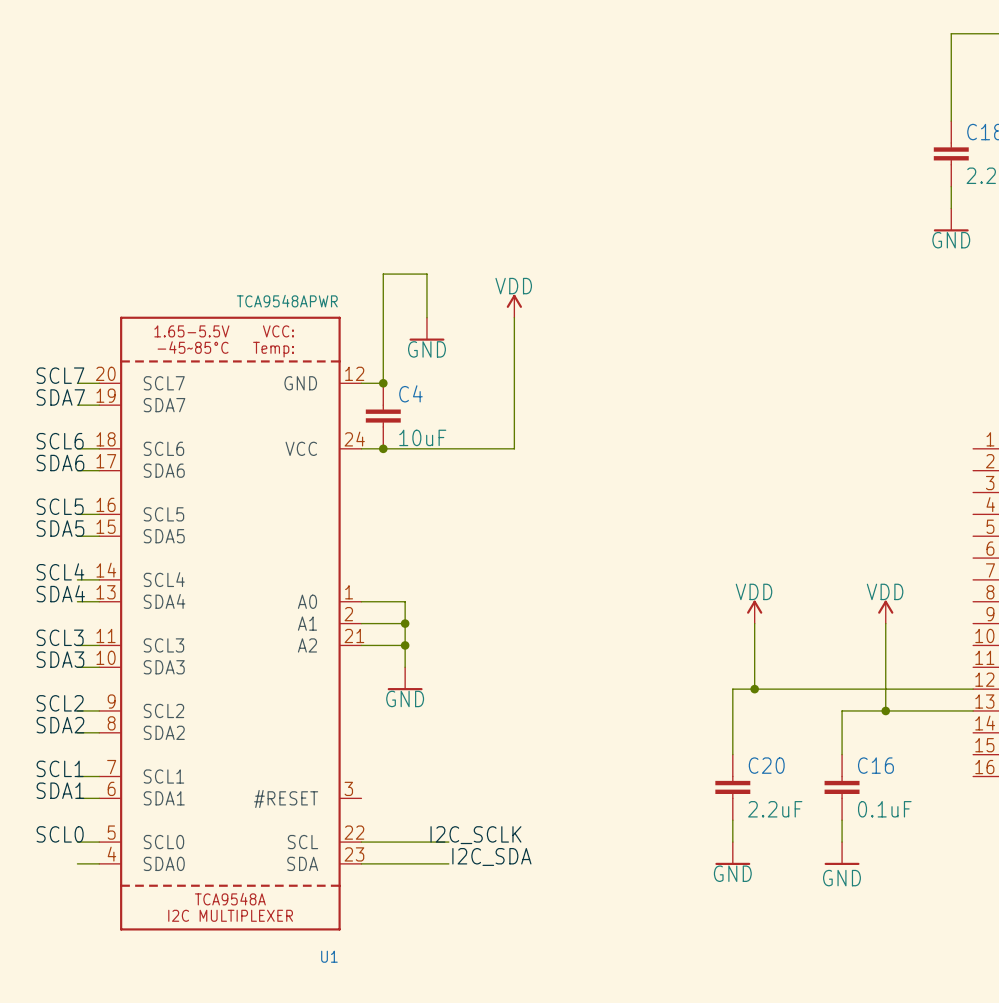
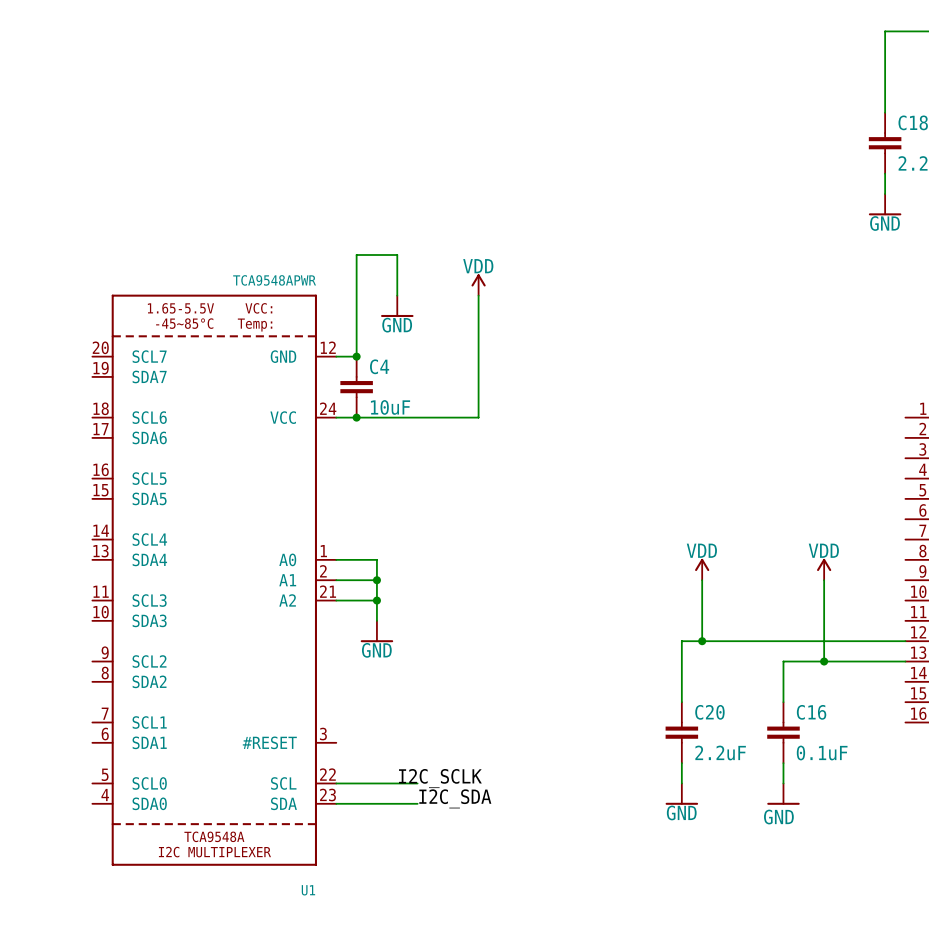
label: SCL7 (60, 375) -> none
wire: (77, 383) (99, 383) -> none
label: SDA7 (60, 397) -> none
wire: (77, 405) (99, 405) -> none
label: SCL6 (60, 441) -> none
wire: (77, 448) (99, 448) -> none
label: SDA6 (60, 463) -> none
wire: (77, 470) (99, 470) -> none
label: SCL5 (60, 506) -> none
wire: (77, 514) (99, 514) -> none
label: SDA5 (60, 528) -> none
wire: (77, 536) (99, 536) -> none
label: SCL4 (60, 571) -> none
wire: (77, 579) (99, 579) -> none
label: SDA4 (60, 593) -> none
wire: (77, 601) (99, 601) -> none
label: SCL3 (60, 637) -> none
wire: (77, 645) (99, 645) -> none
label: SDA3 (60, 659) -> none
wire: (77, 667) (99, 667) -> none
label: SCL2 (60, 703) -> none
wire: (77, 710) (99, 710) -> none
label: SDA2 (60, 725) -> none
wire: (77, 732) (99, 732) -> none
label: SCL1 (60, 768) -> none
wire: (77, 776) (99, 776) -> none
label: SDA1 (60, 790) -> none
wire: (77, 798) (99, 798) -> none
label: SCL0 (60, 834) -> none
wire: (77, 842) (99, 842) -> none
wire: (77, 863) (99, 863) -> none

